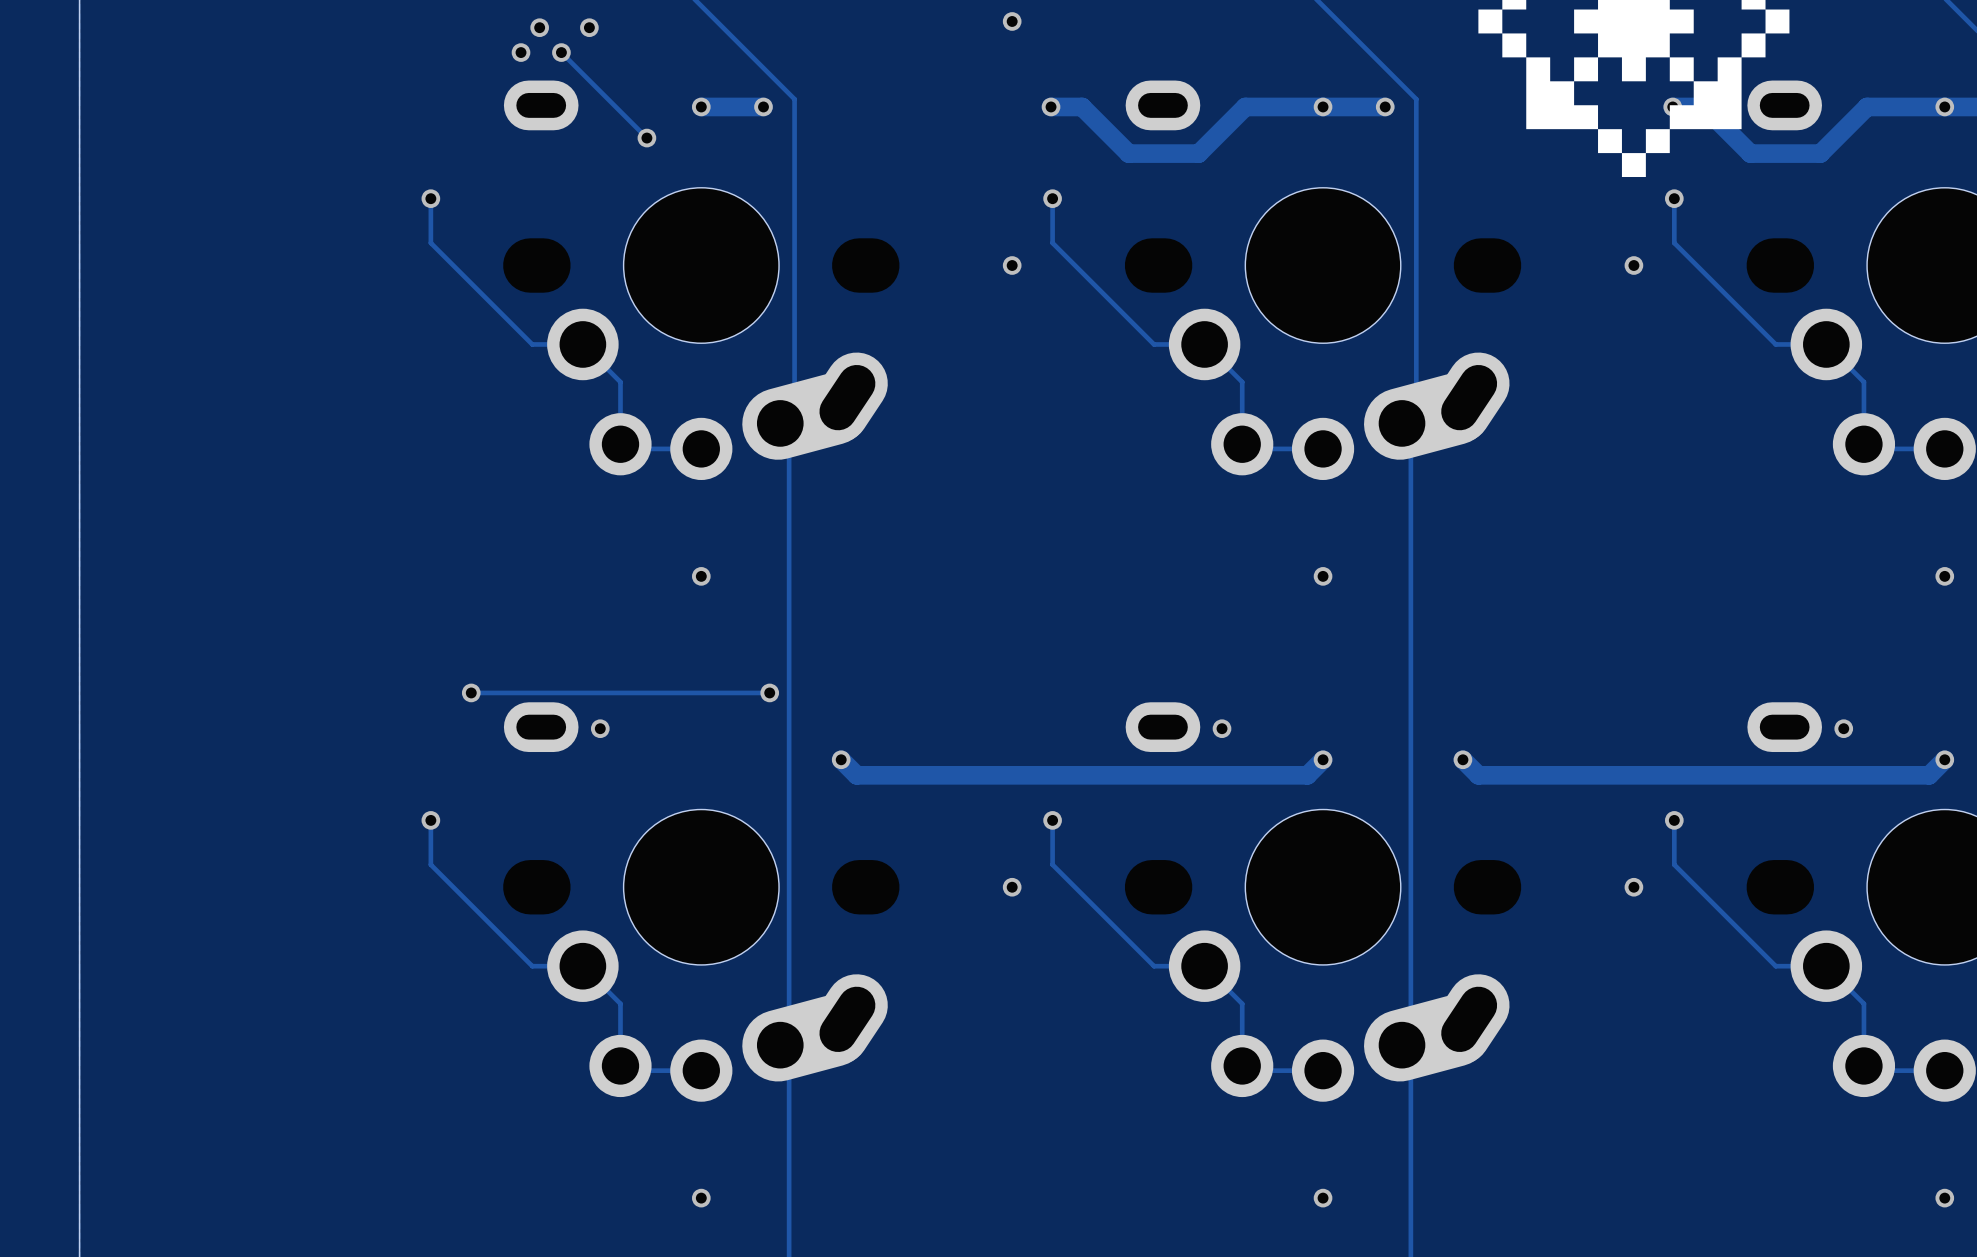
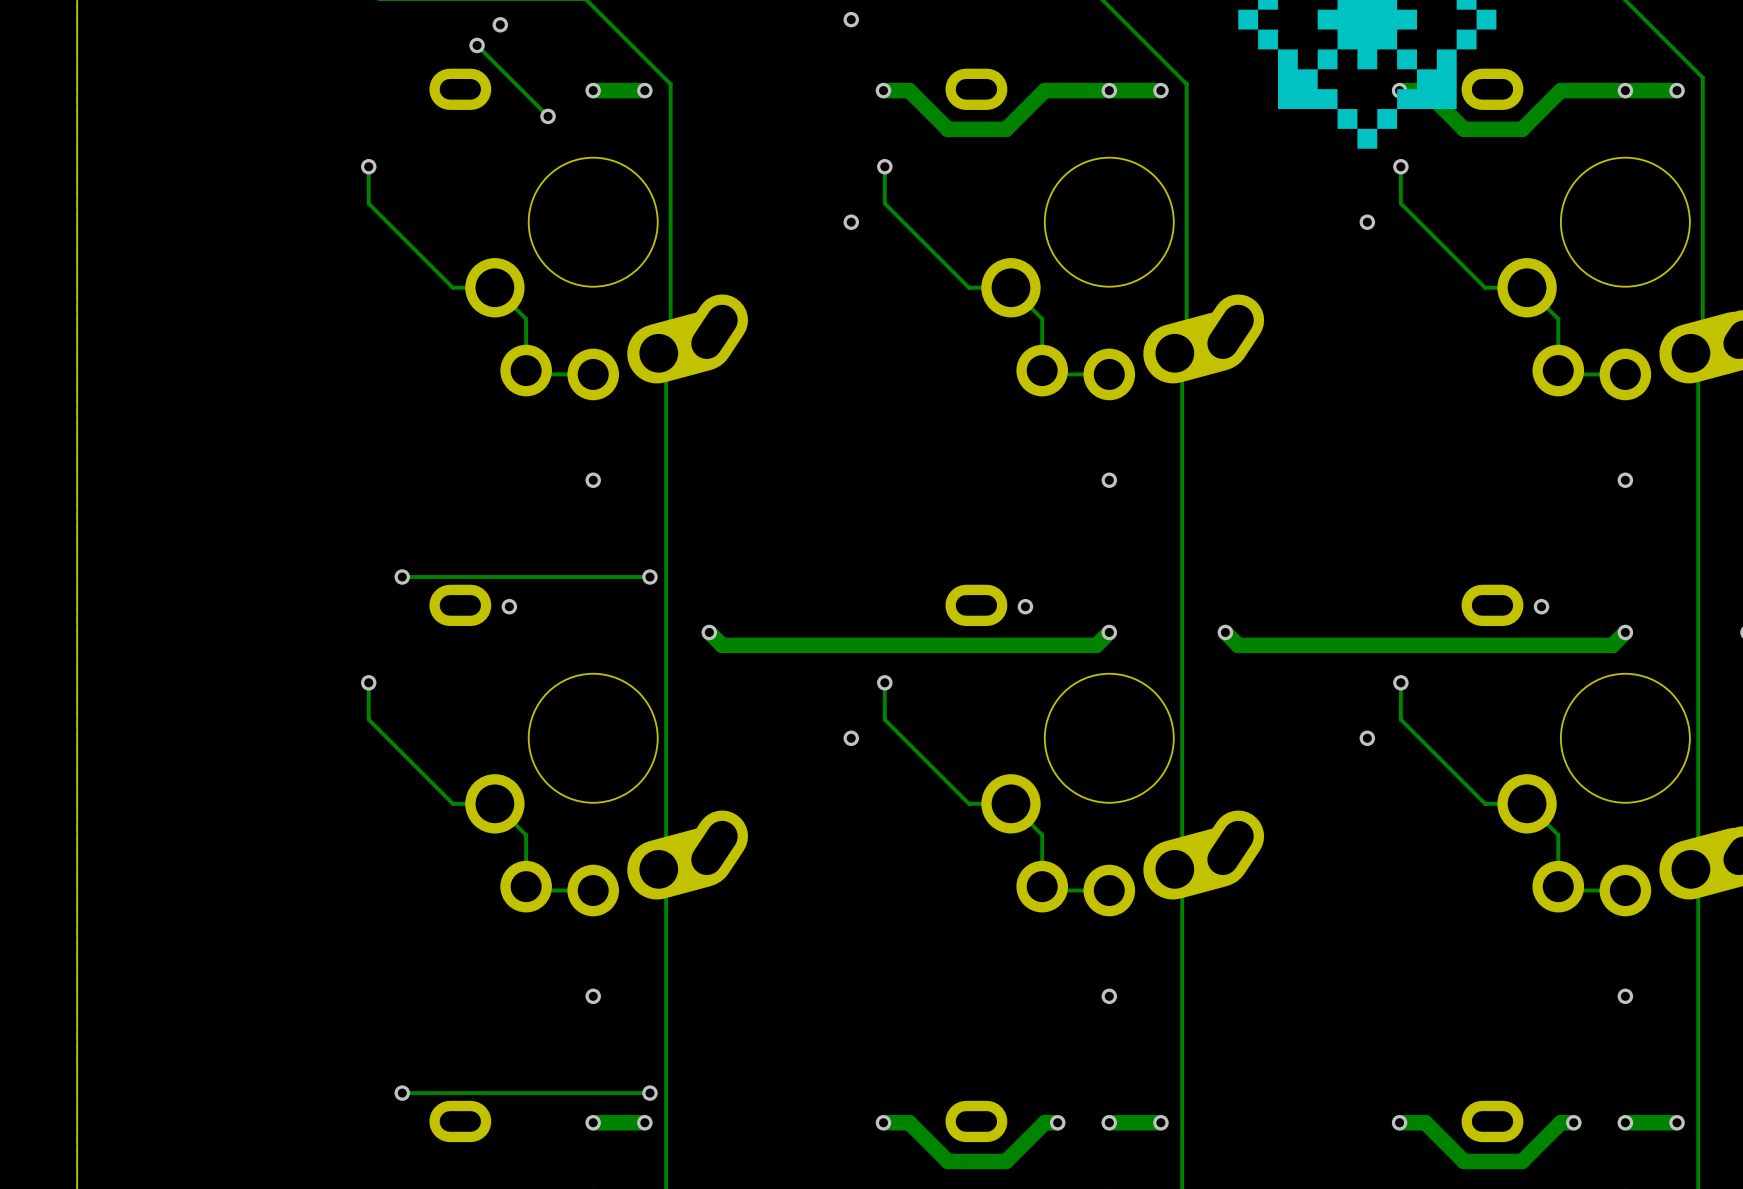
via: (539, 27) -> none
via: (521, 52) -> none

